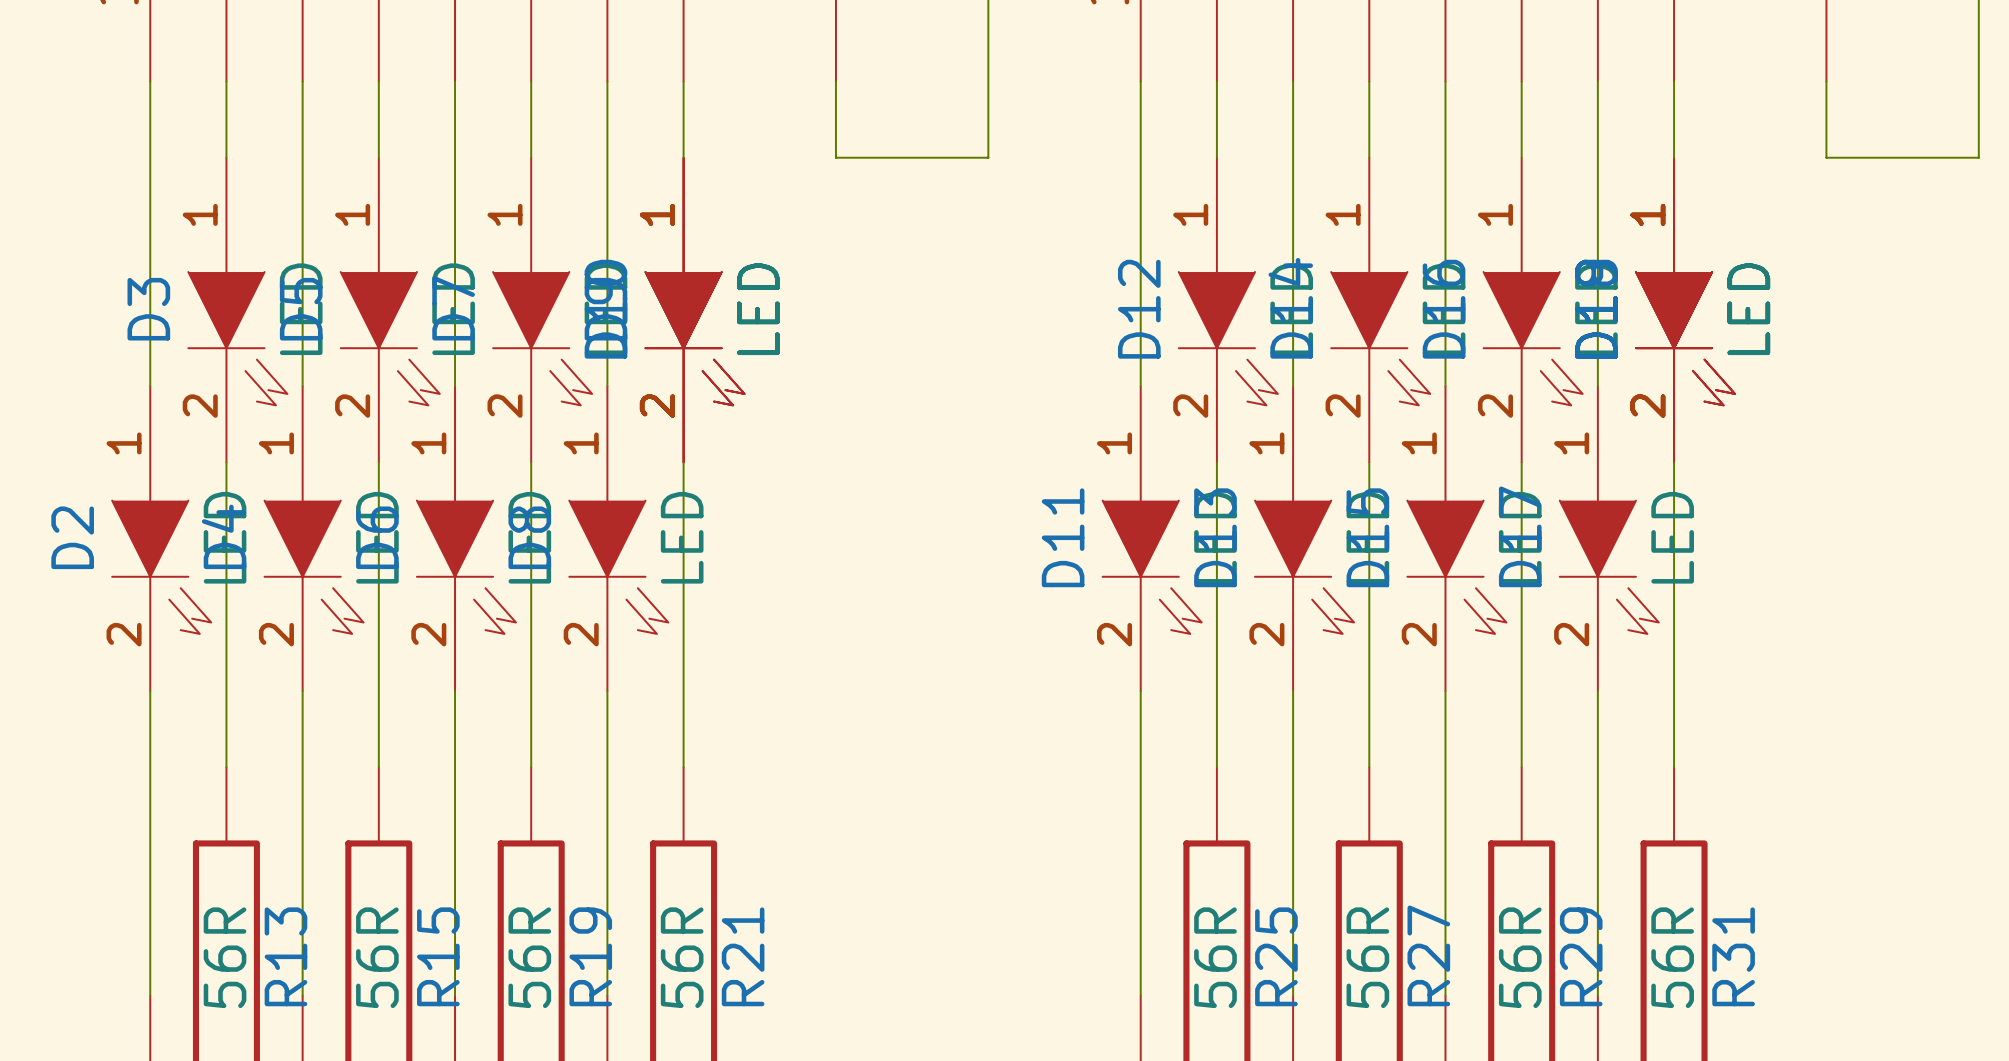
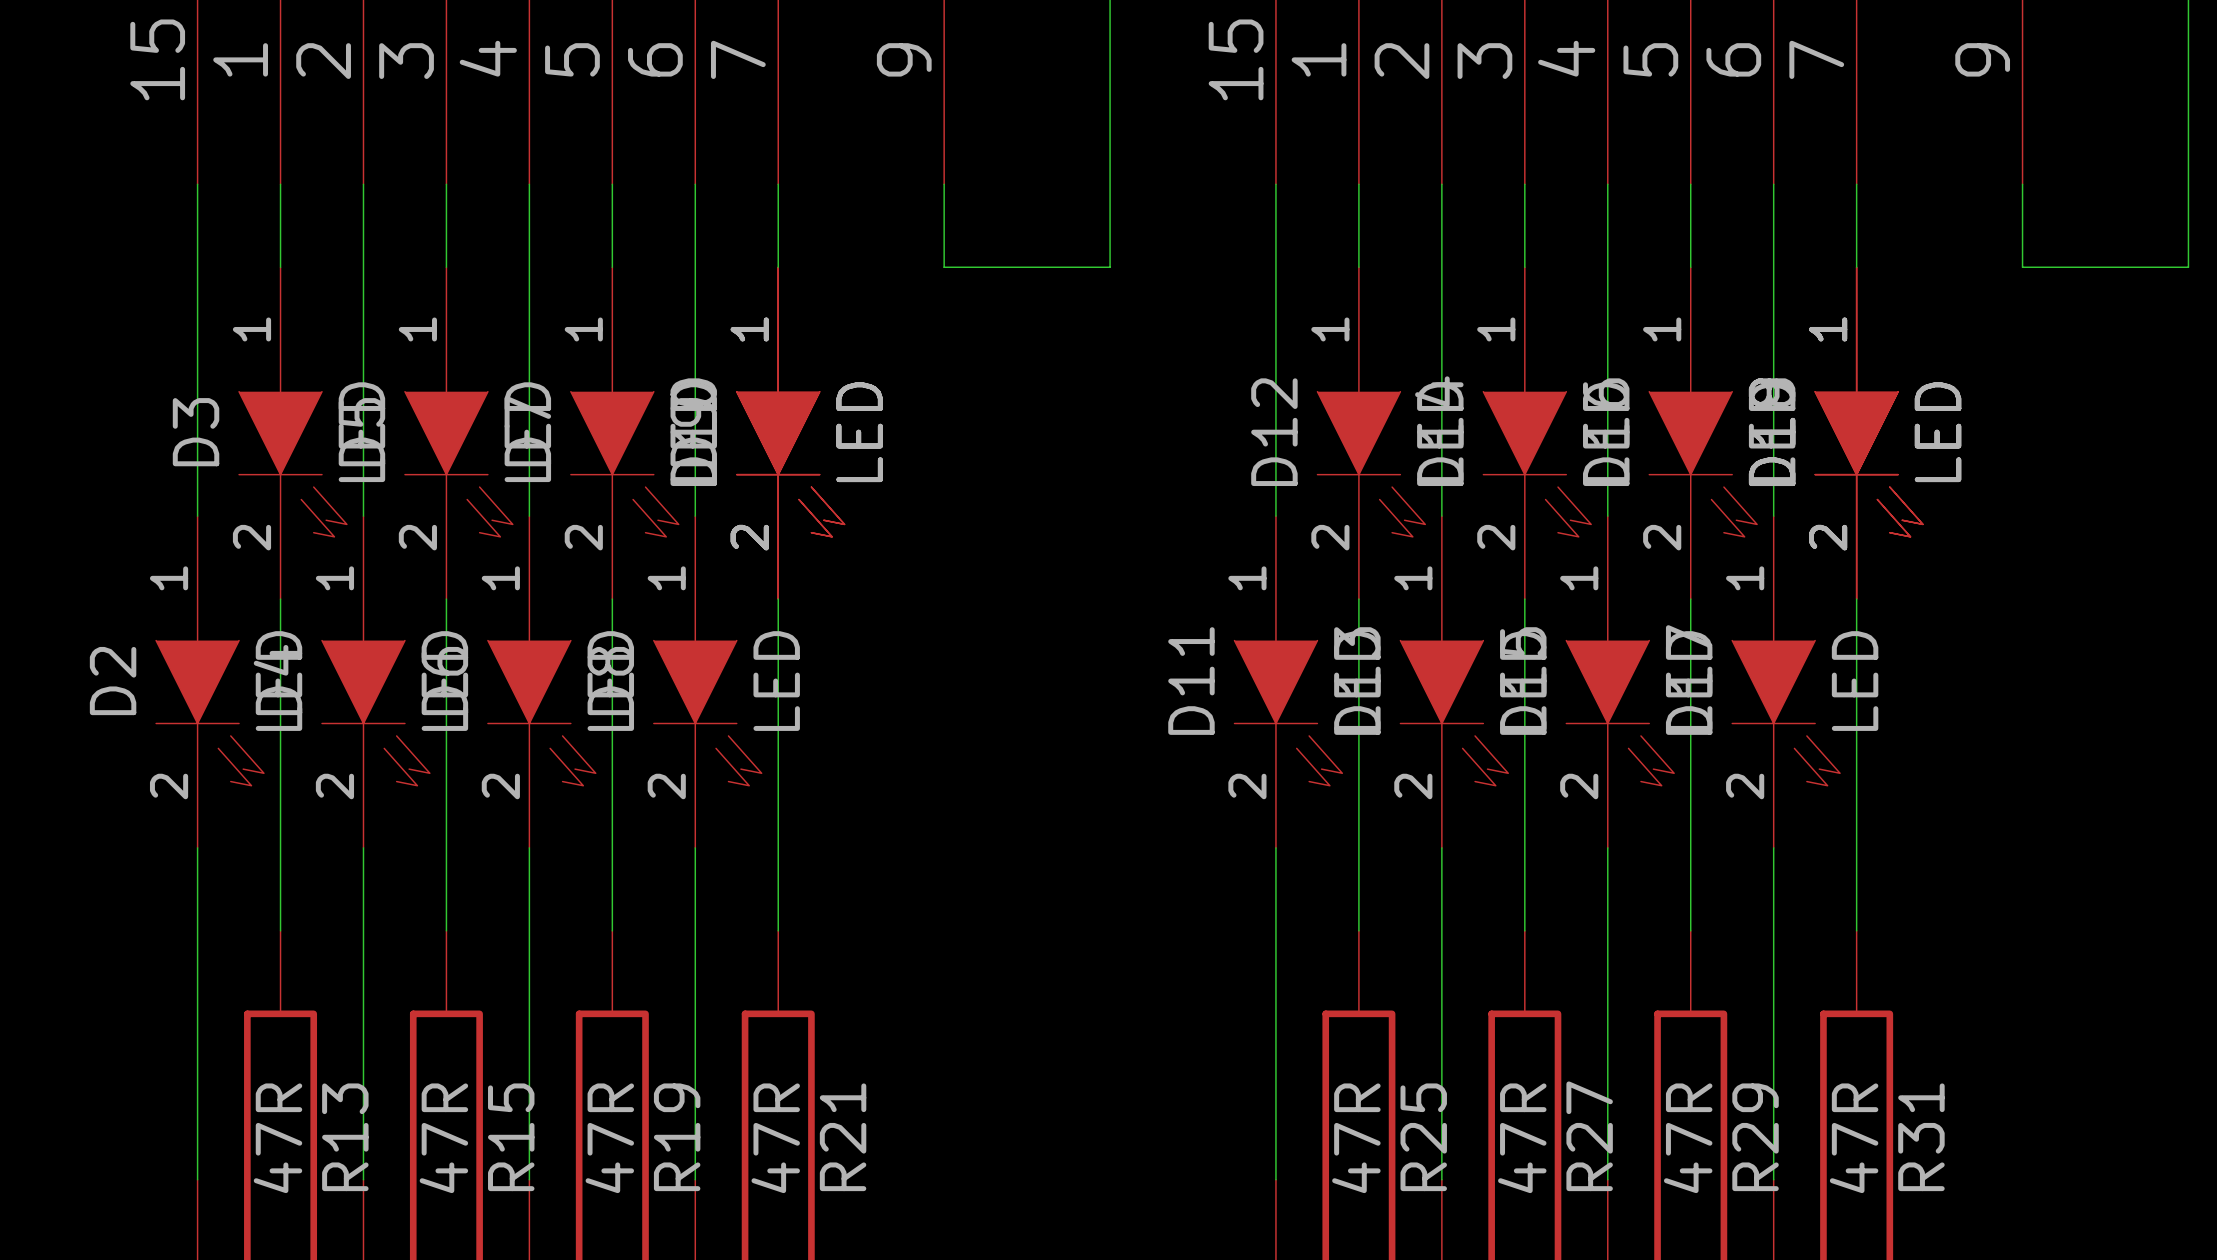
R13 value: 56R (225, 957) -> 47R (277, 1138)
R15 value: 56R (377, 957) -> 47R (443, 1138)
R19 value: 56R (529, 957) -> 47R (609, 1138)
R21 value: 56R (682, 957) -> 47R (775, 1138)
R25 value: 56R (1215, 957) -> 47R (1356, 1138)
R27 value: 56R (1367, 957) -> 47R (1522, 1138)
R29 value: 56R (1520, 957) -> 47R (1688, 1138)
R31 value: 56R (1672, 957) -> 47R (1854, 1138)

